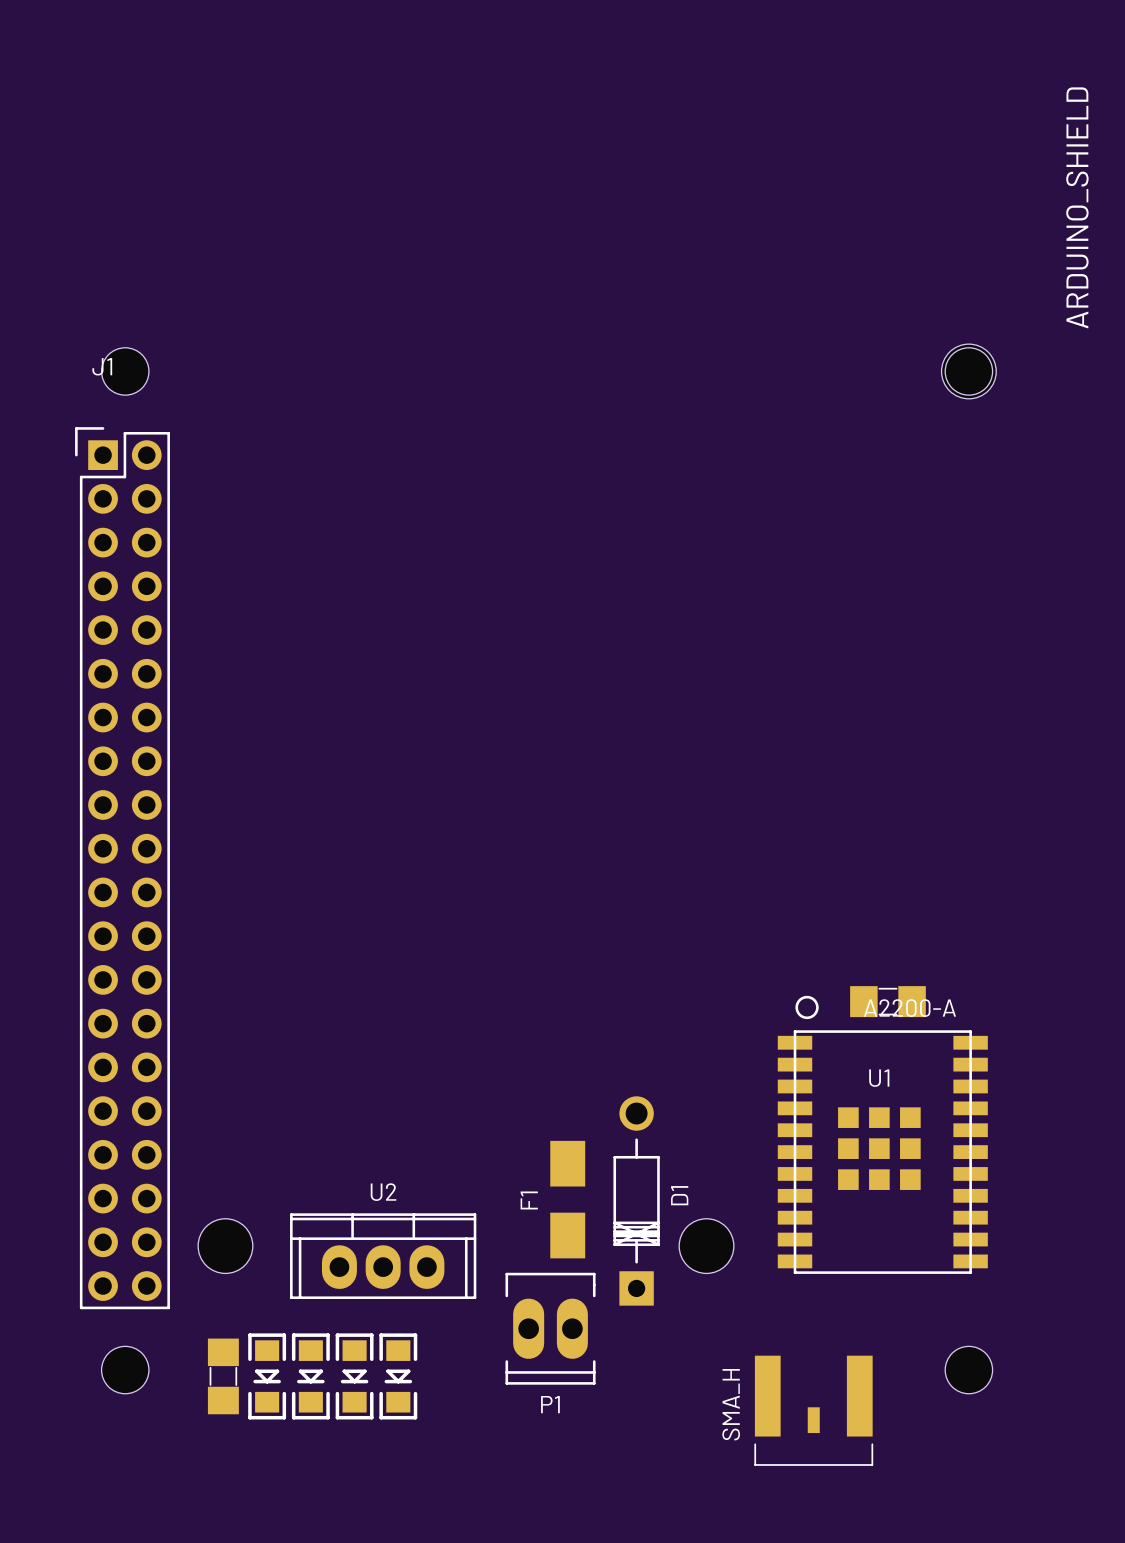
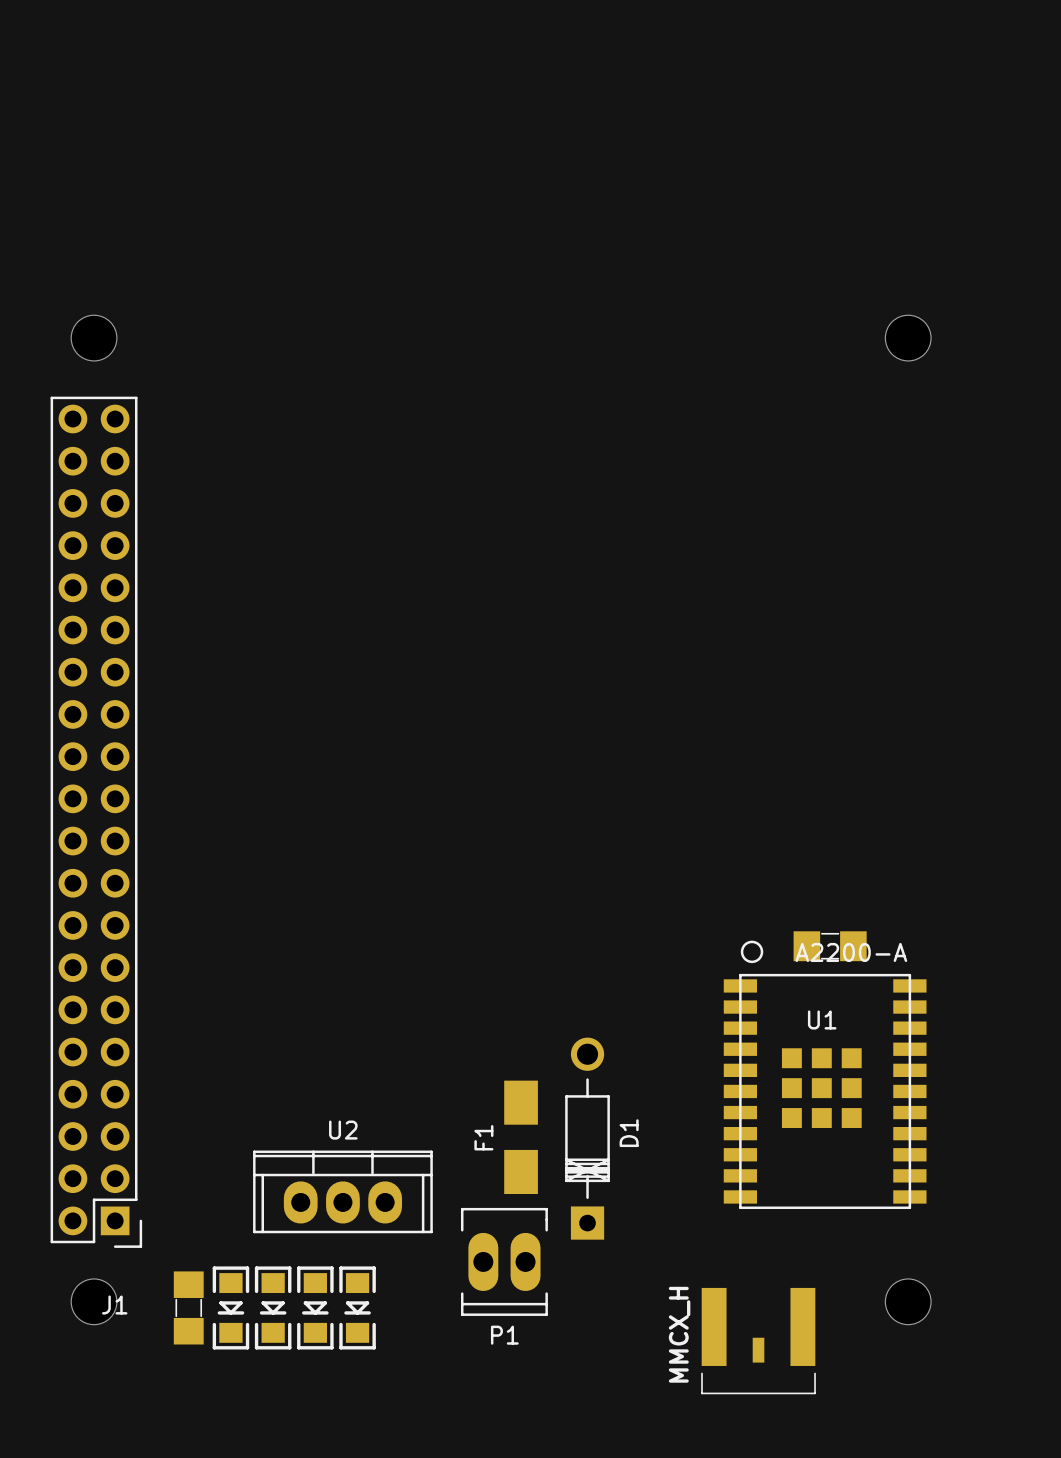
ARDUINO_SHIELD: (597, 808) -> none
J1 rotation: 0° (122, 868) -> 180° (96, 822)
part value: SMA_H (731, 1404) -> MMCX_H (679, 1334)

